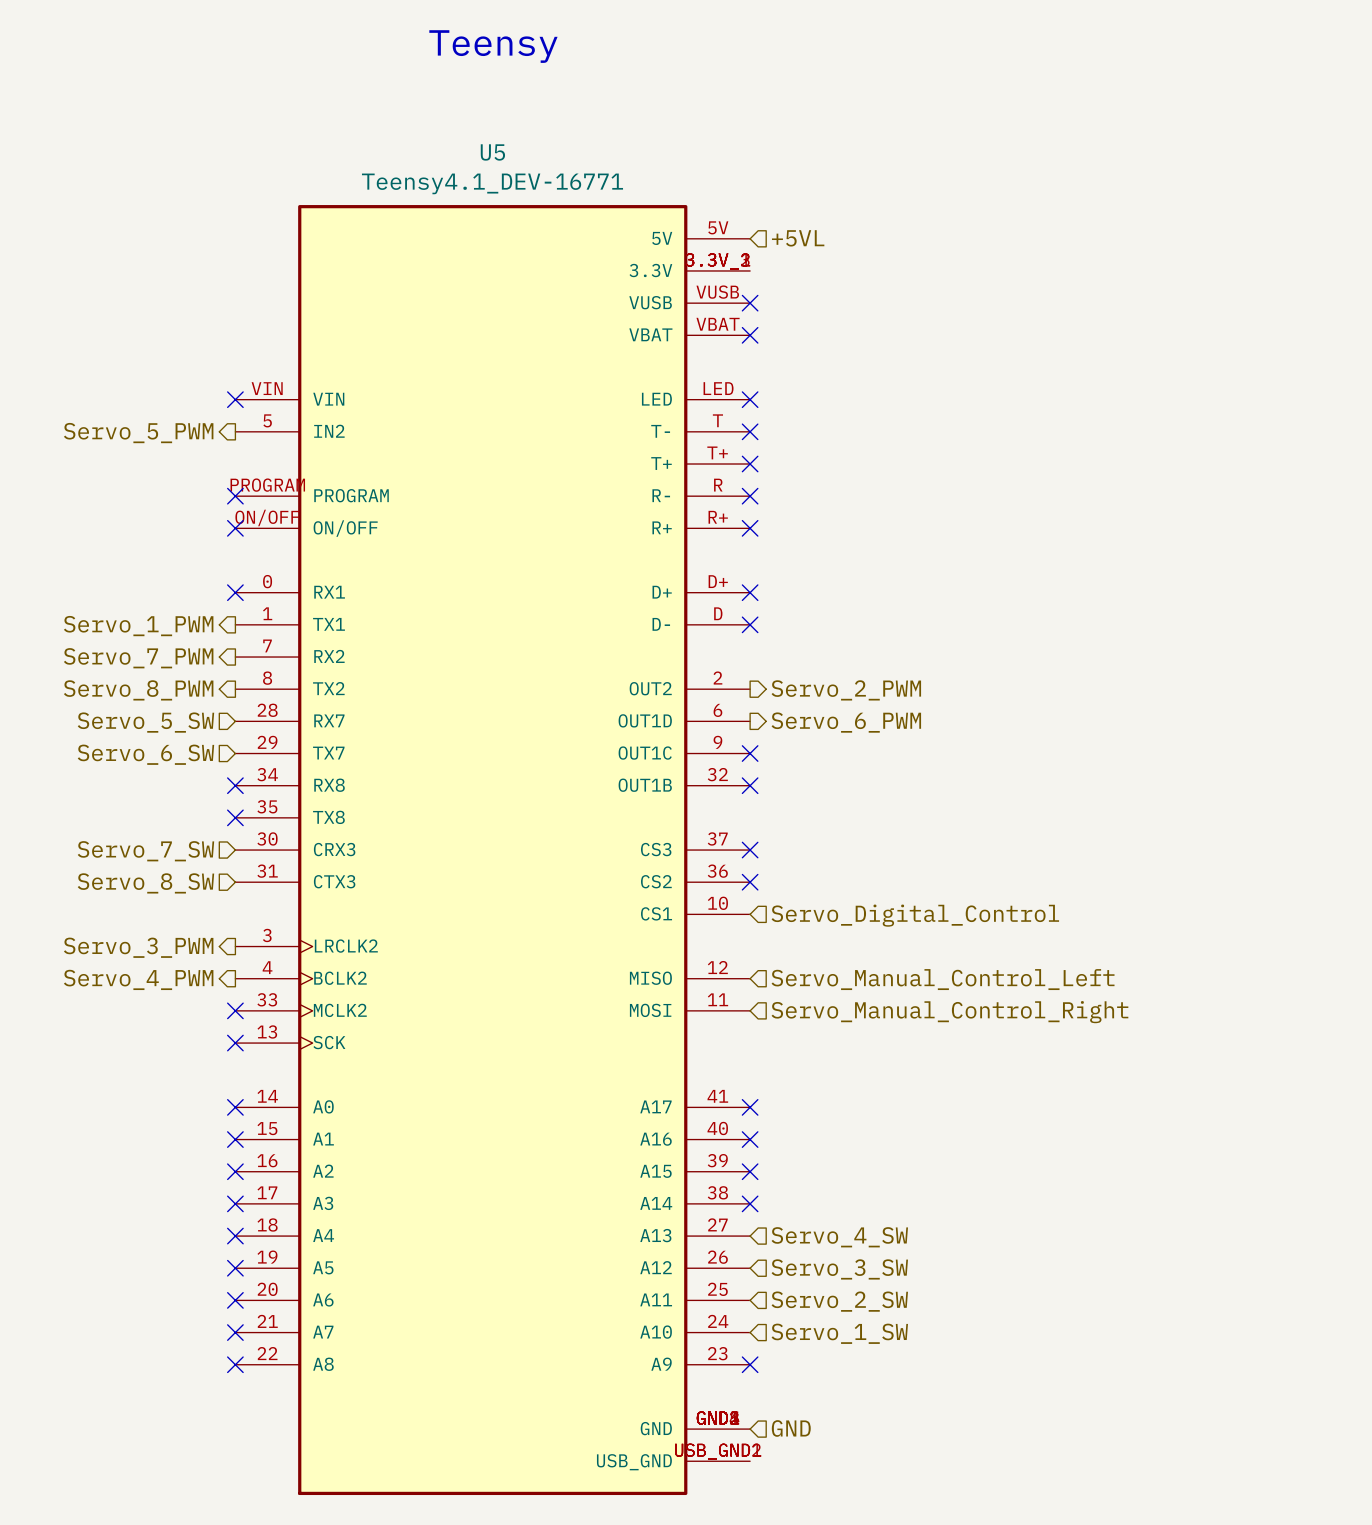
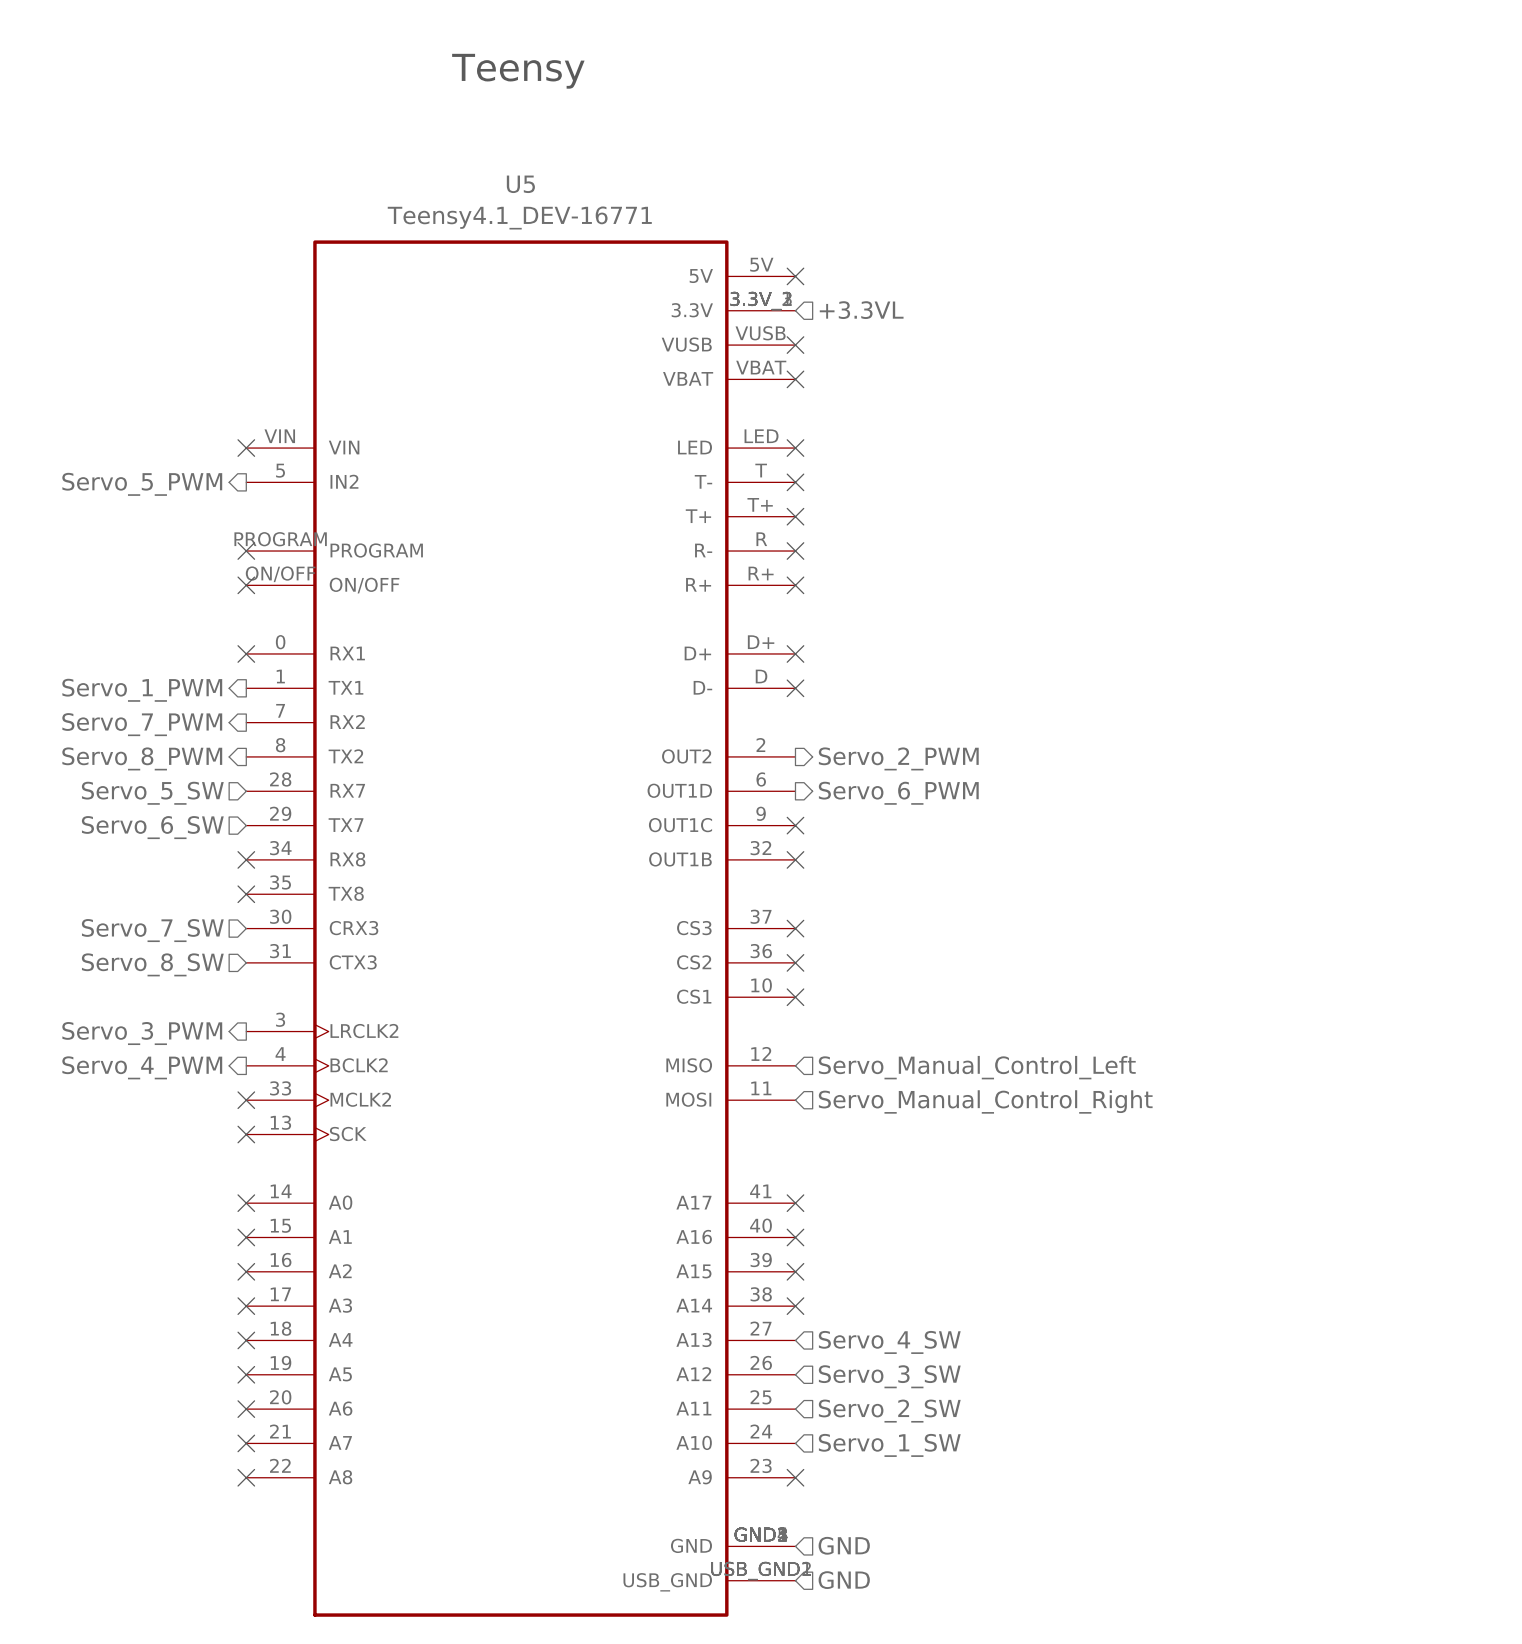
no-connect mark: none -> (795, 276)
hierarchical label: +5VL (798, 238) -> none
hierarchical label: none -> +3.3VL (861, 310)
no-connect mark: none -> (795, 997)
hierarchical label: Servo_Digital_Control (915, 915) -> none
hierarchical label: none -> GND (844, 1580)

